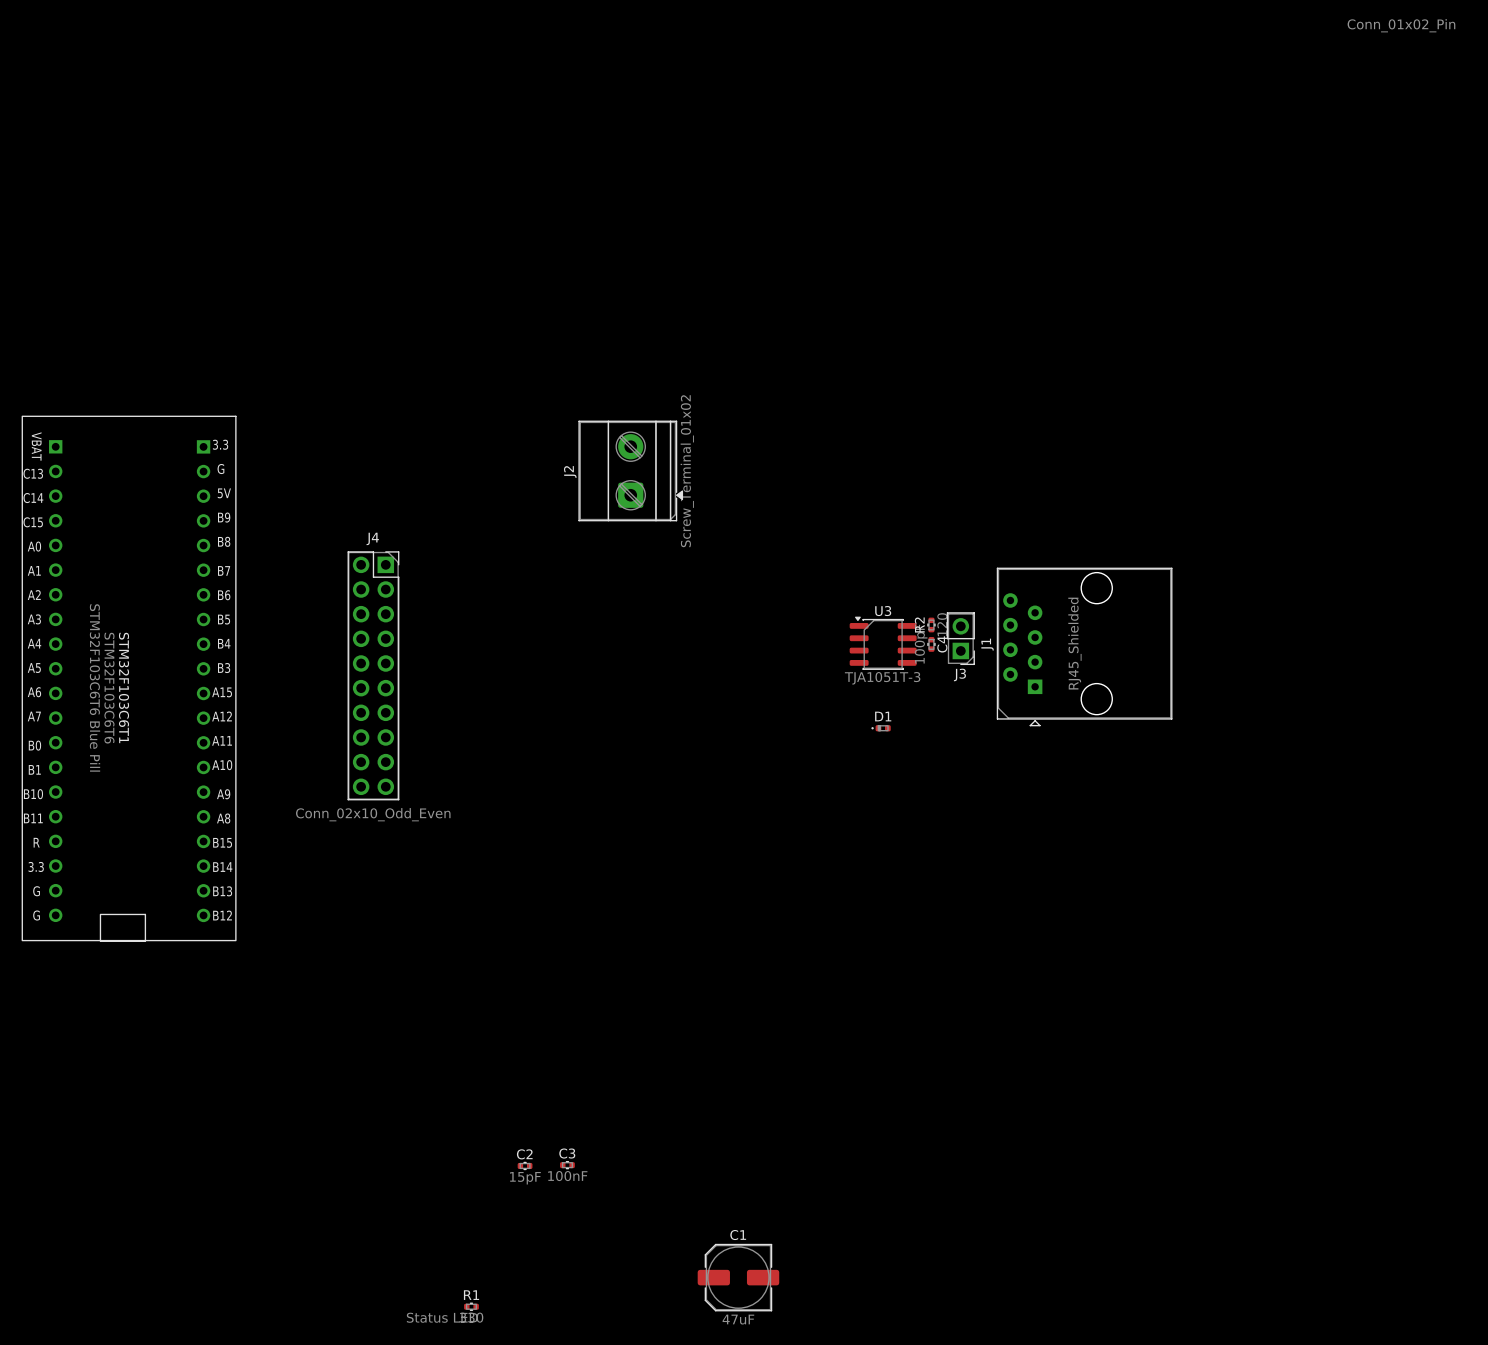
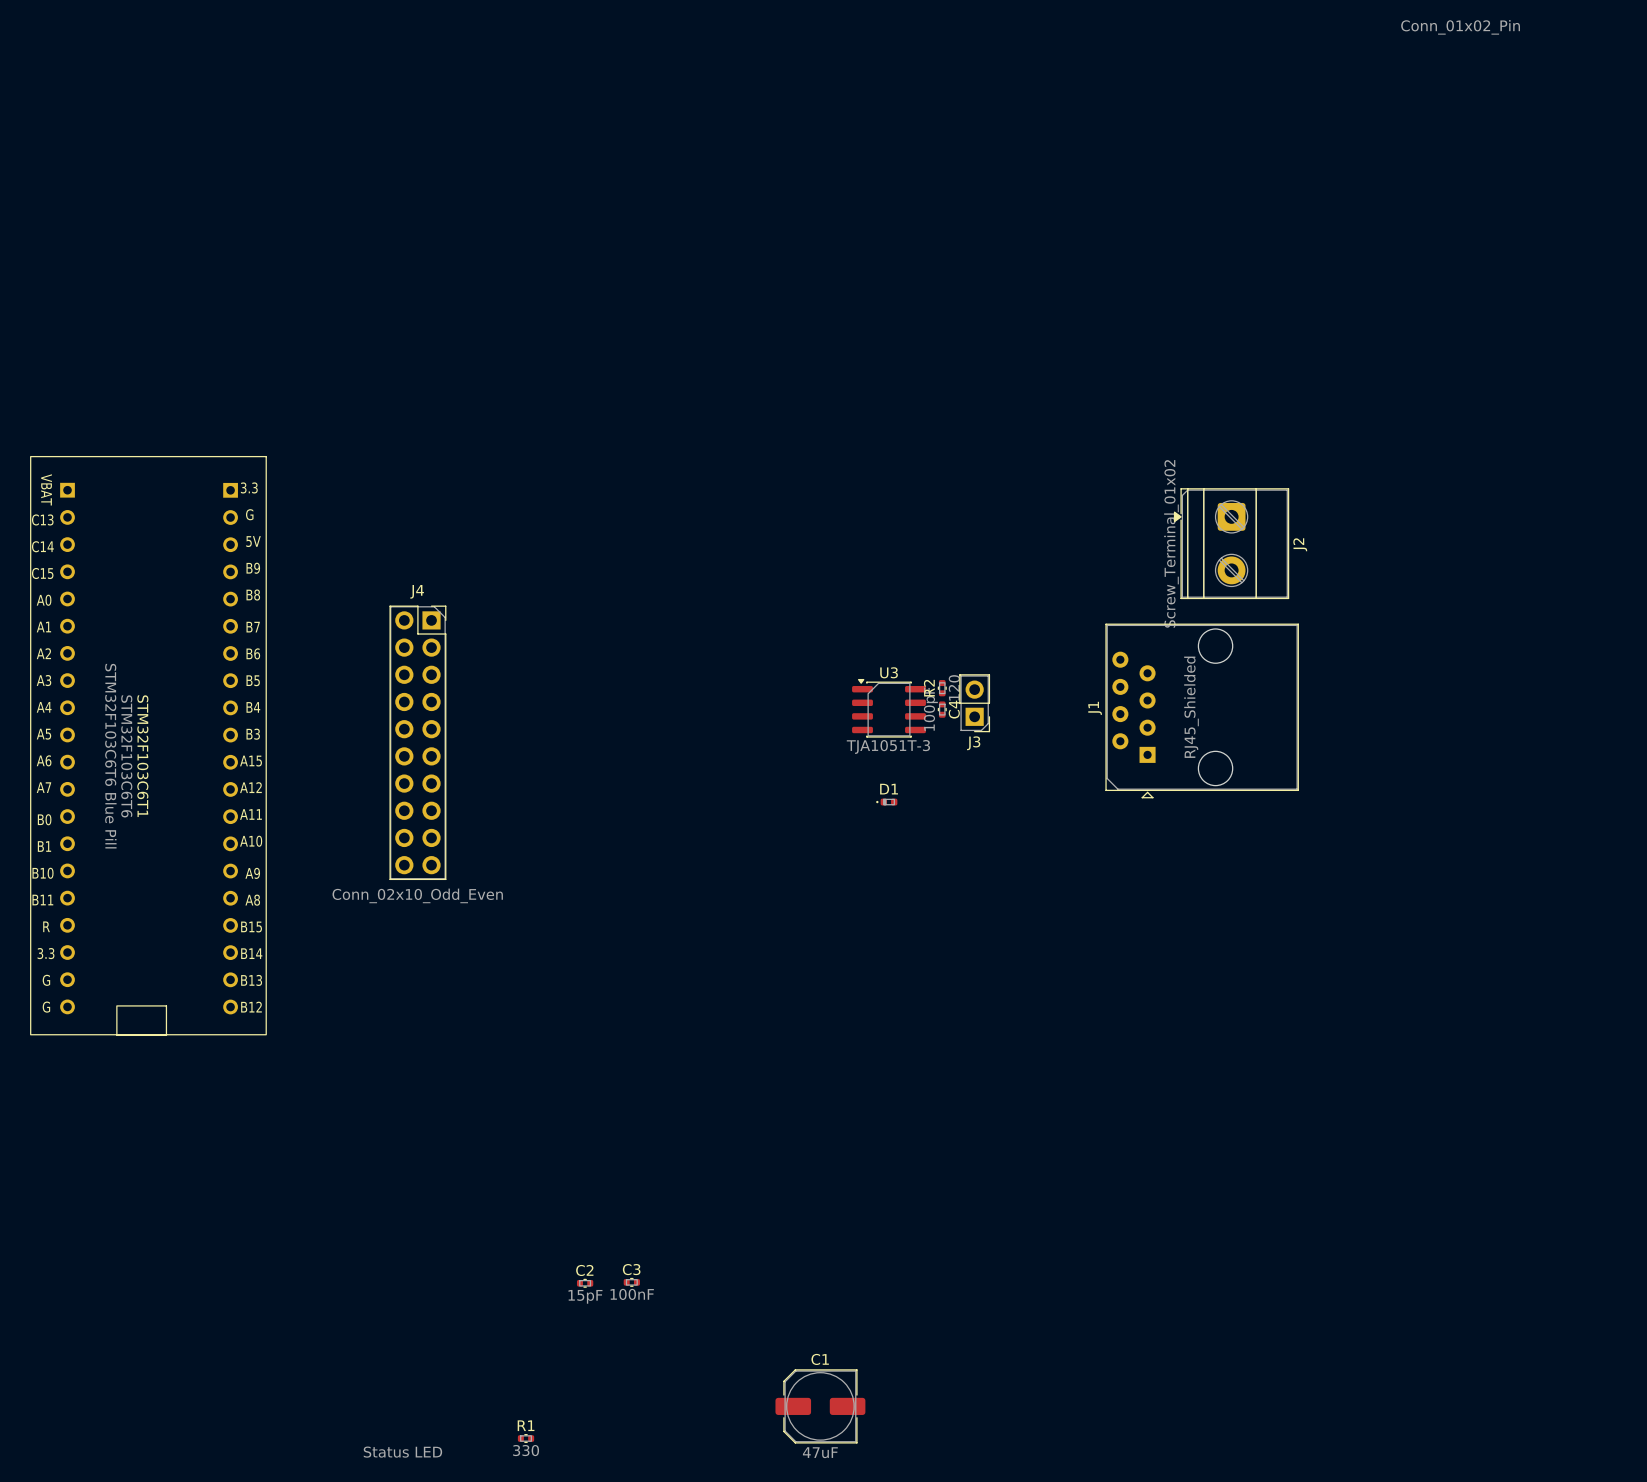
J2 rotation: 0° (630, 470) -> 180° (1231, 543)
J2 position: (630, 470) -> (1231, 543)
R2 position: (931, 625) -> (942, 688)
J3 position: (960, 638) -> (974, 703)
U3 position: (883, 643) -> (889, 708)
C4 position: (931, 644) -> (942, 709)
D1 position: (881, 728) -> (886, 802)

